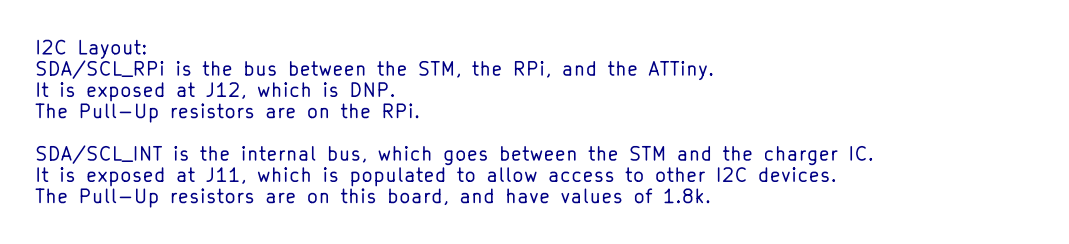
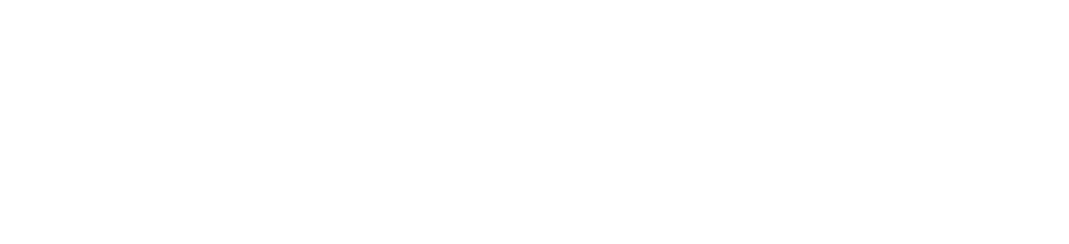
text: I2C Layout: (91, 49) -> none
text: SDA/SCL_RPi is the bus between the STM, the RPi, and the ATTiny. (374, 70) -> none
text: It is exposed at J12, which is DNP. (215, 91) -> none
text: The Pull-Up resistors are on the RPi. (226, 113) -> none
text: SDA/SCL_INT is the internal bus, which goes between the STM and the charger IC. (454, 155) -> none
text: It is exposed at J11, which is populated to allow access to other I2C devices. (436, 176) -> none
text: The Pull-Up resistors are on this board, and have values of 1.8k. (372, 198) -> none

